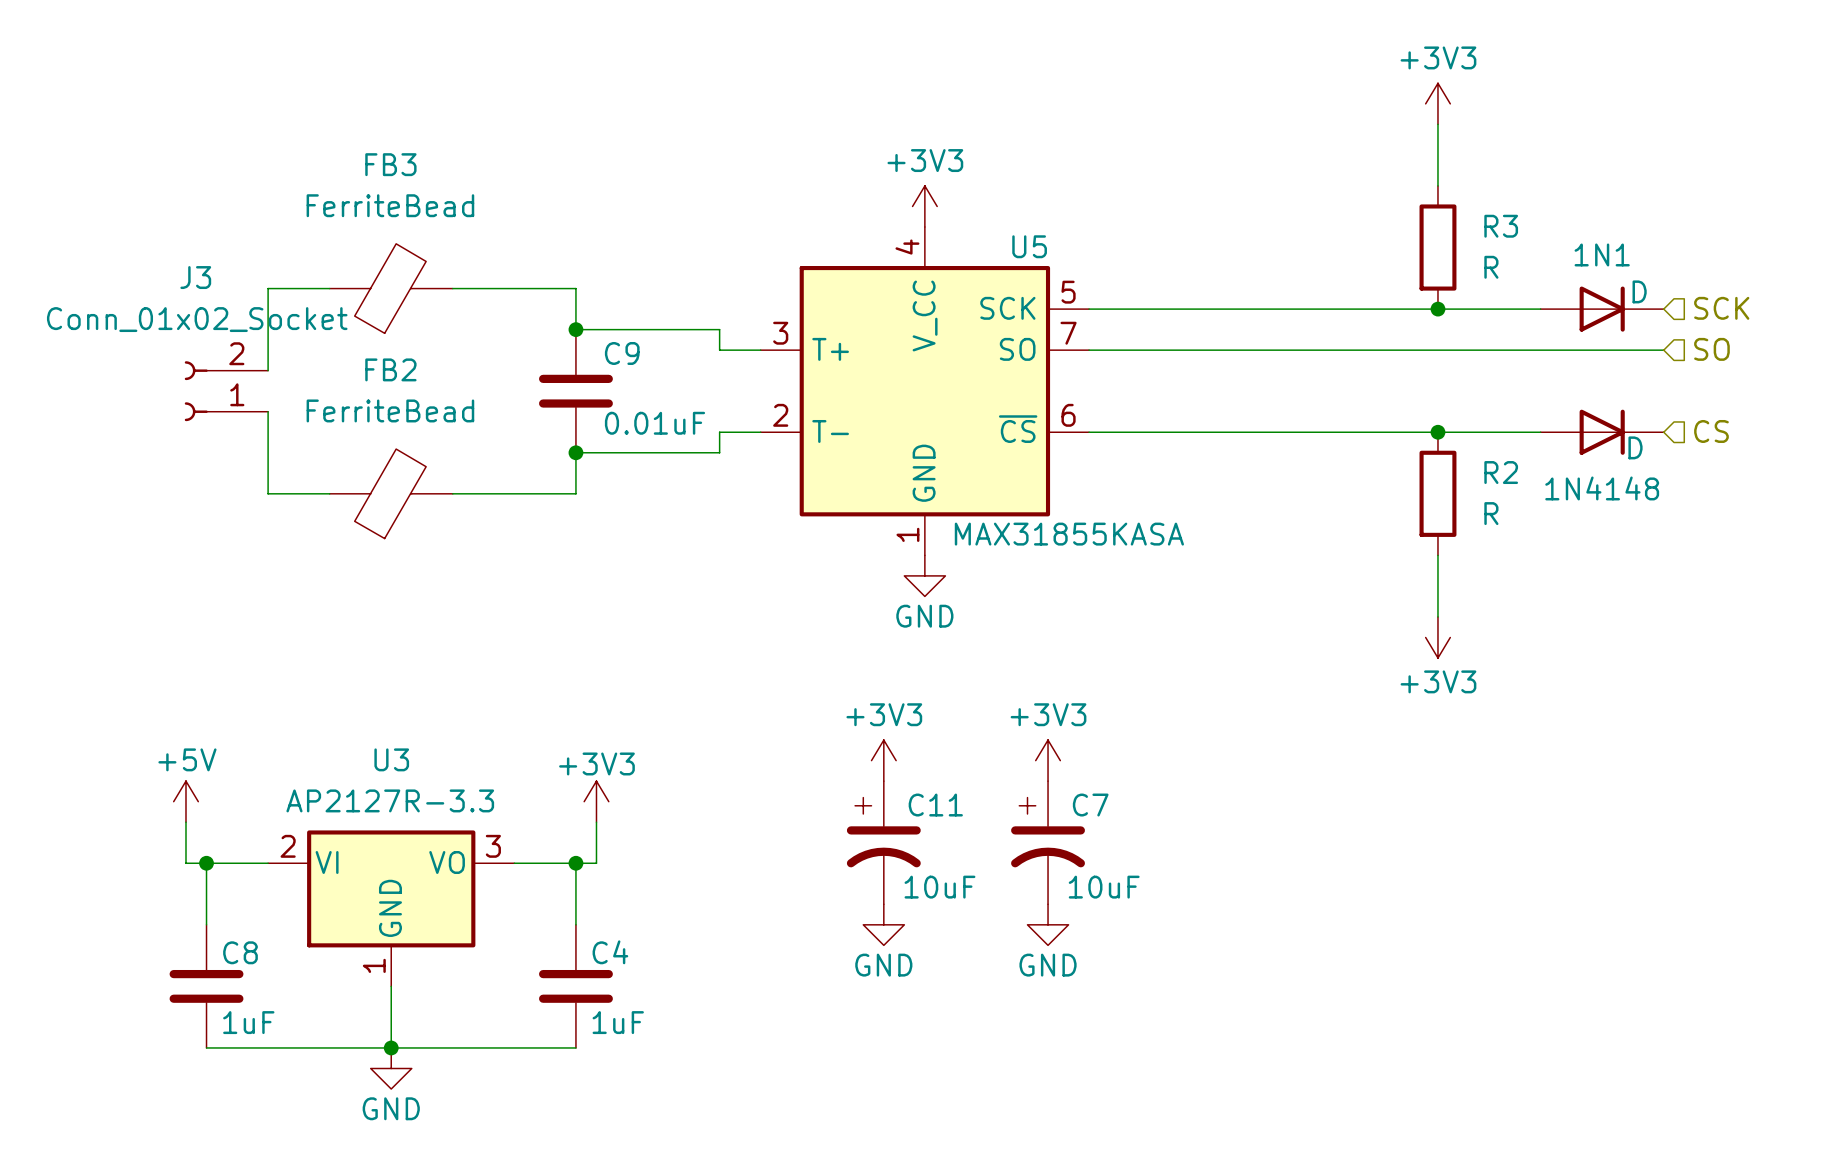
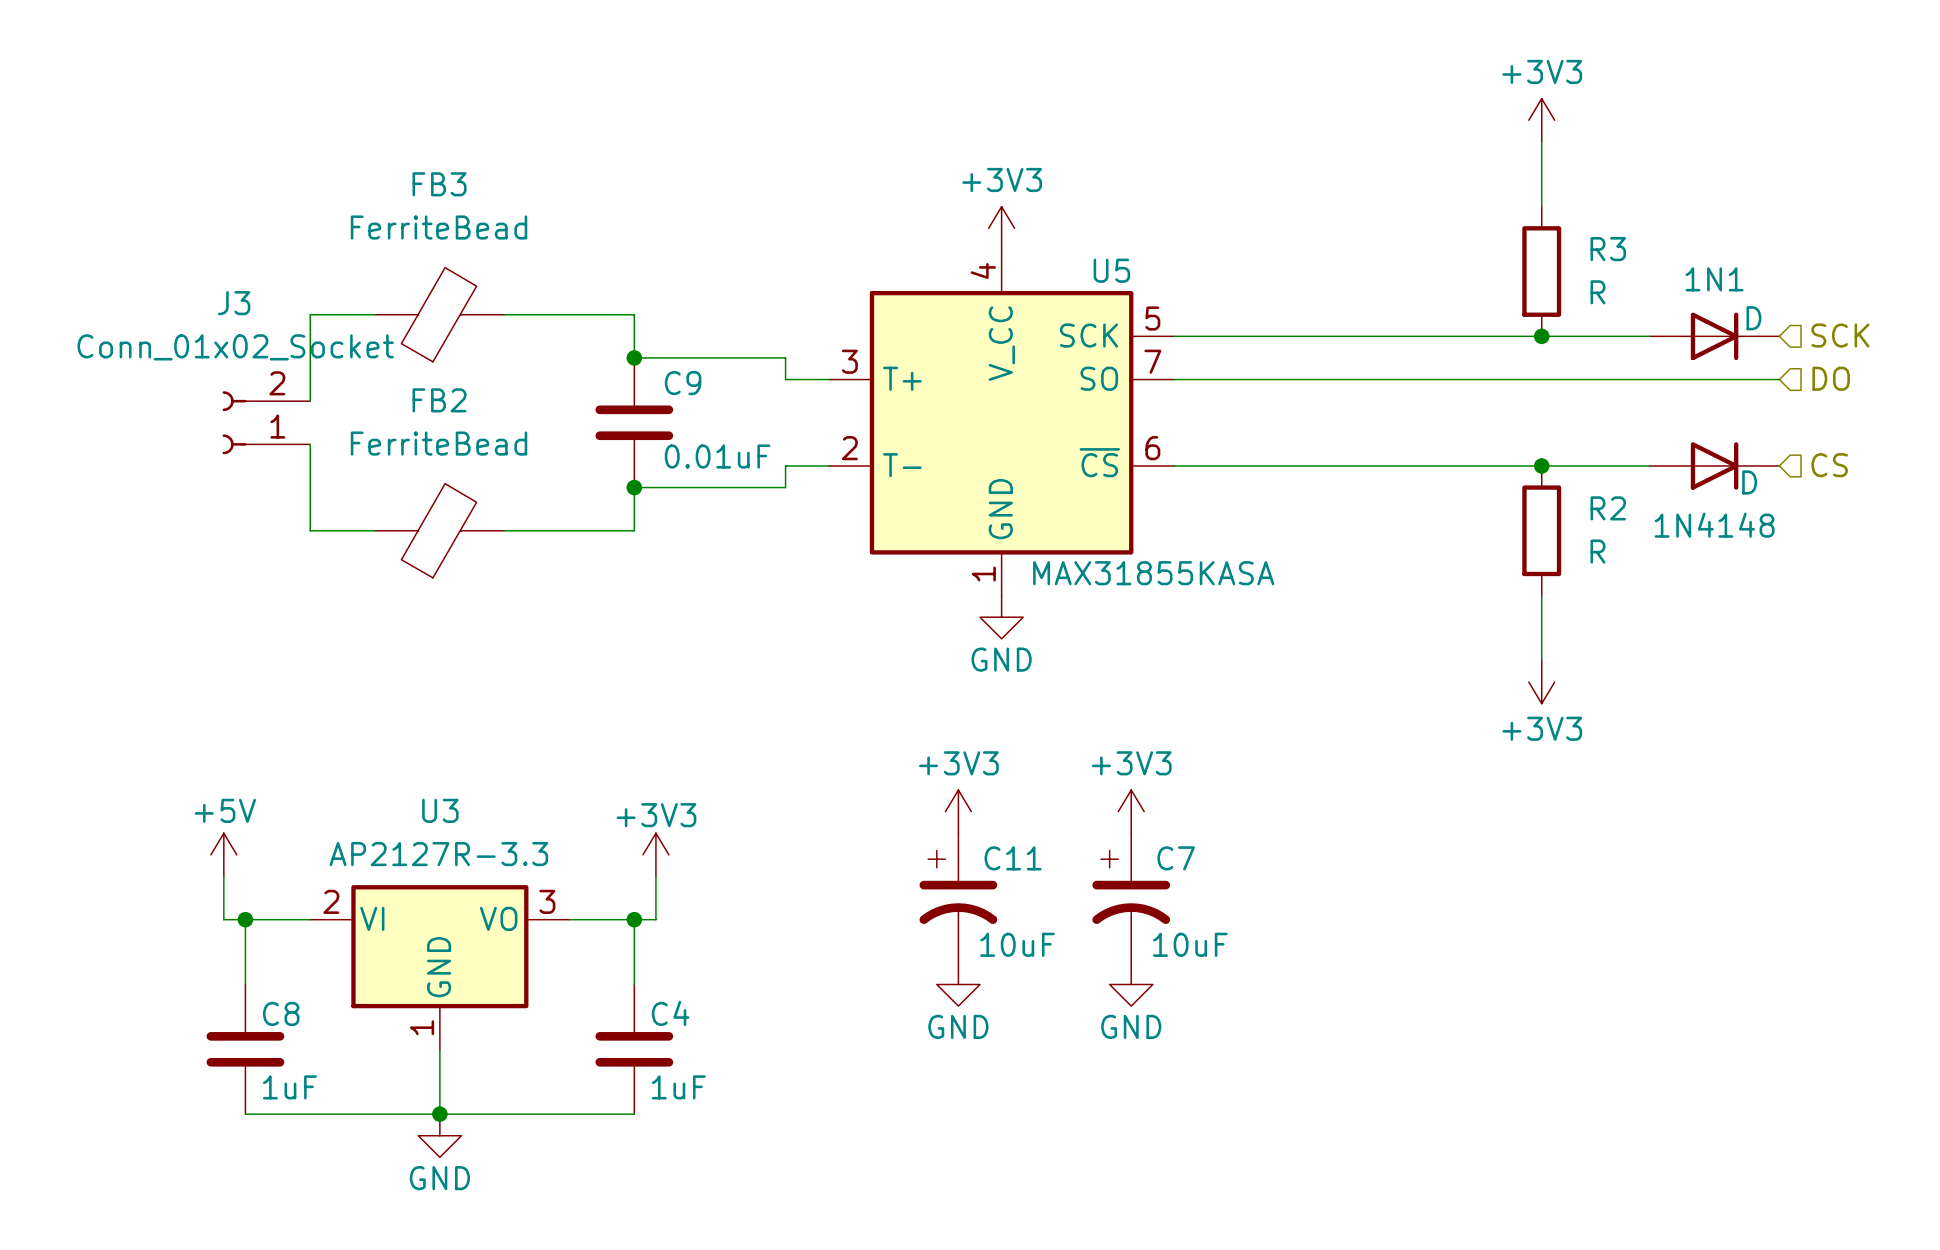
hierarchical label: SO (1711, 349) -> DO (1831, 378)

